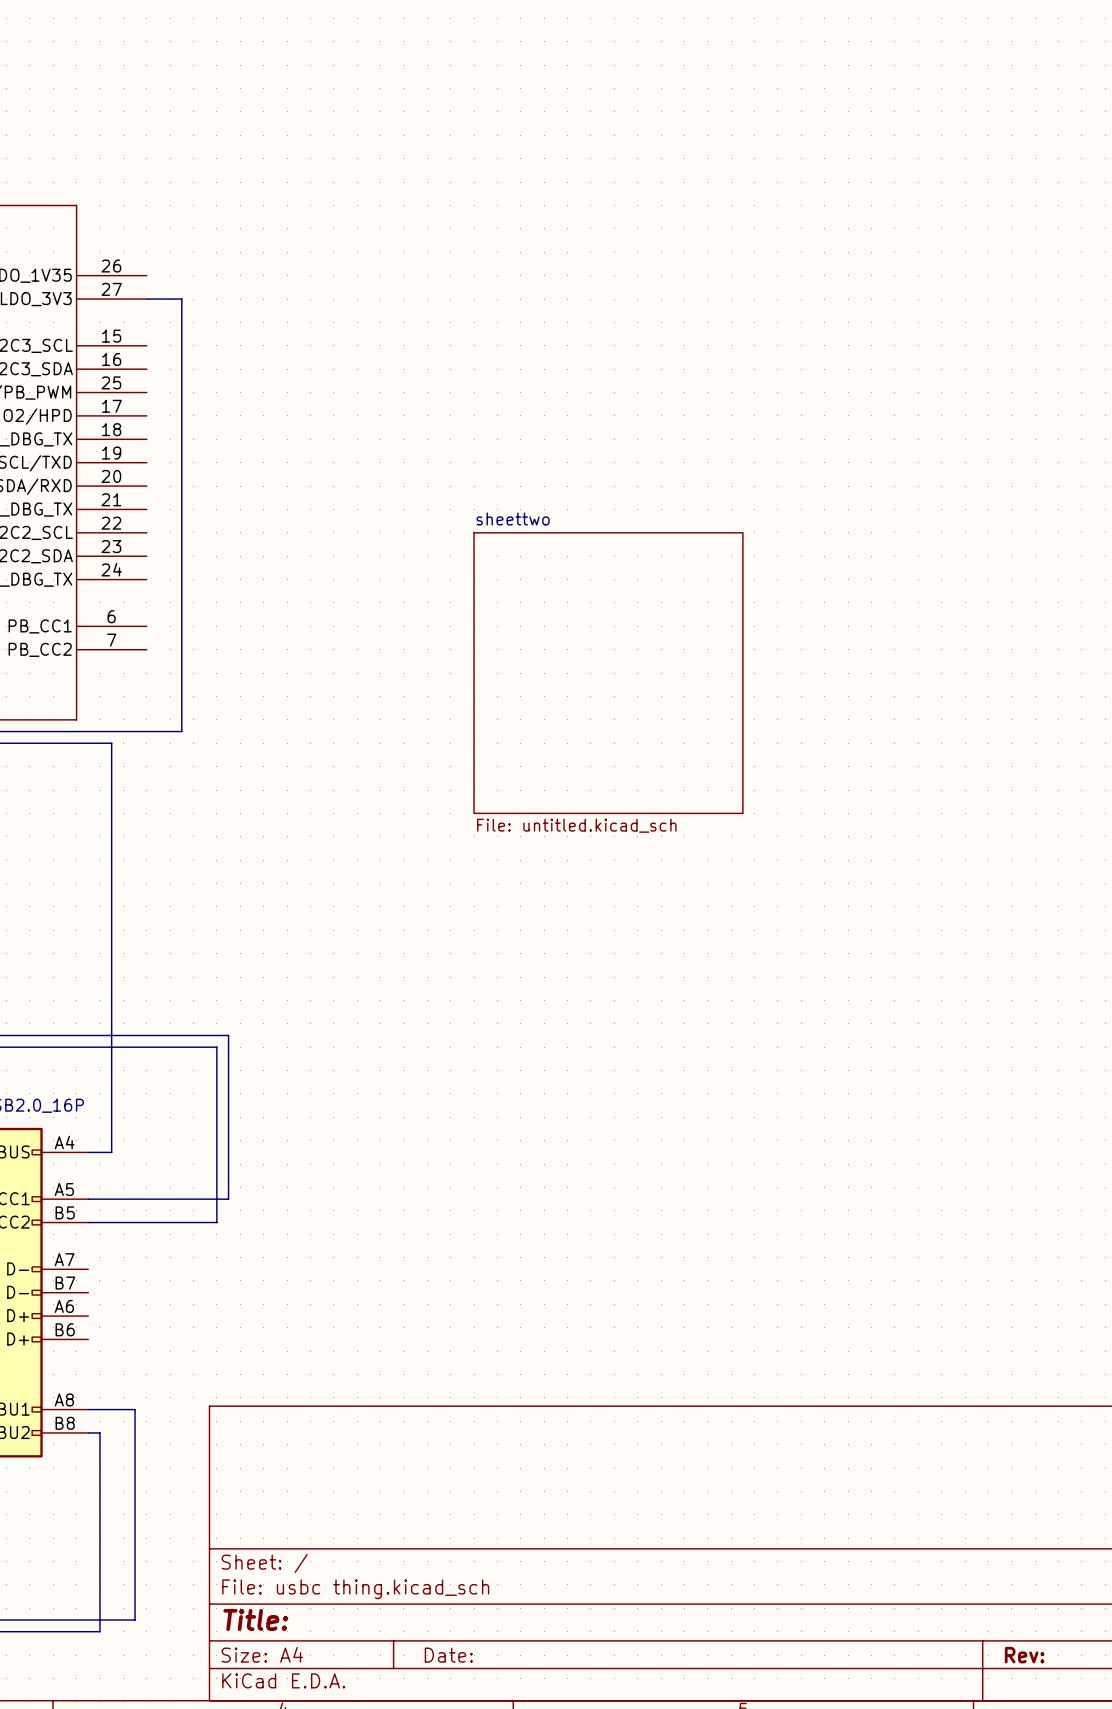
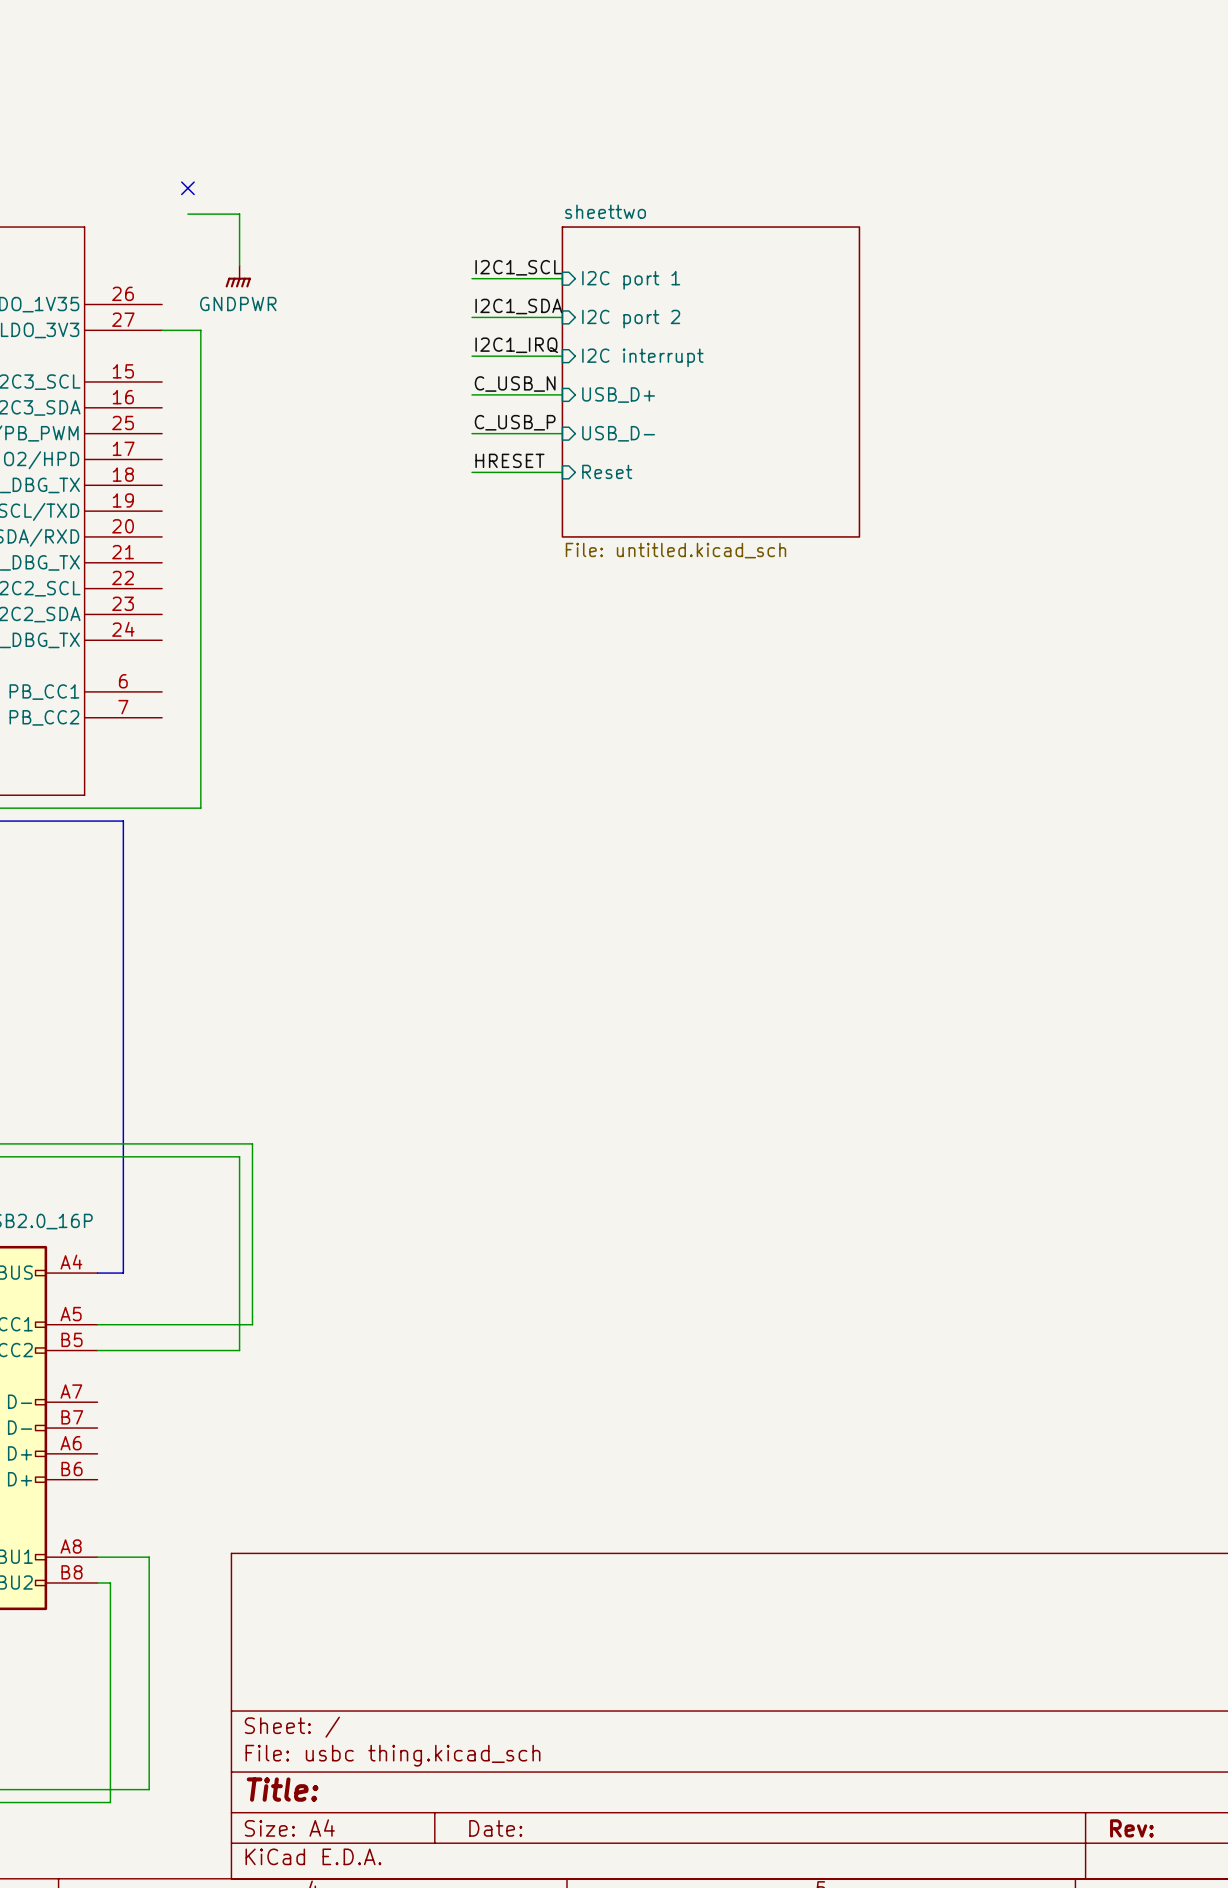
no-connect mark: none -> (187, 188)
wire: none -> (187, 214) (239, 214) (239, 265)
label: none -> I2C1_SCL (518, 267)
power symbol: none -> GNDPWR (238, 276)
wire: none -> (472, 278) (562, 278)
sheet pin: none -> I2C port 1 (631, 280)
label: none -> I2C1_SDA (518, 306)
wire: none -> (472, 317) (562, 317)
sheet pin: none -> I2C port 2 (631, 319)
label: none -> I2C1_IRQ (516, 345)
wire: none -> (472, 356) (562, 356)
sheet pin: none -> I2C interrupt (642, 357)
sheet sheettwo: none -> File: untitled.kicad_sch (710, 381)
label: none -> C_USB_N (515, 383)
wire: none -> (472, 394) (562, 394)
sheet pin: none -> USB_D+ (618, 395)
label: none -> C_USB_P (515, 422)
wire: none -> (472, 433) (562, 433)
sheet pin: none -> USB_D- (618, 433)
label: none -> HRESET (509, 460)
wire: none -> (472, 472) (562, 472)
sheet pin: none -> Reset (607, 471)
sheet sheettwo: File: untitled.kicad_sch (608, 673) -> none

